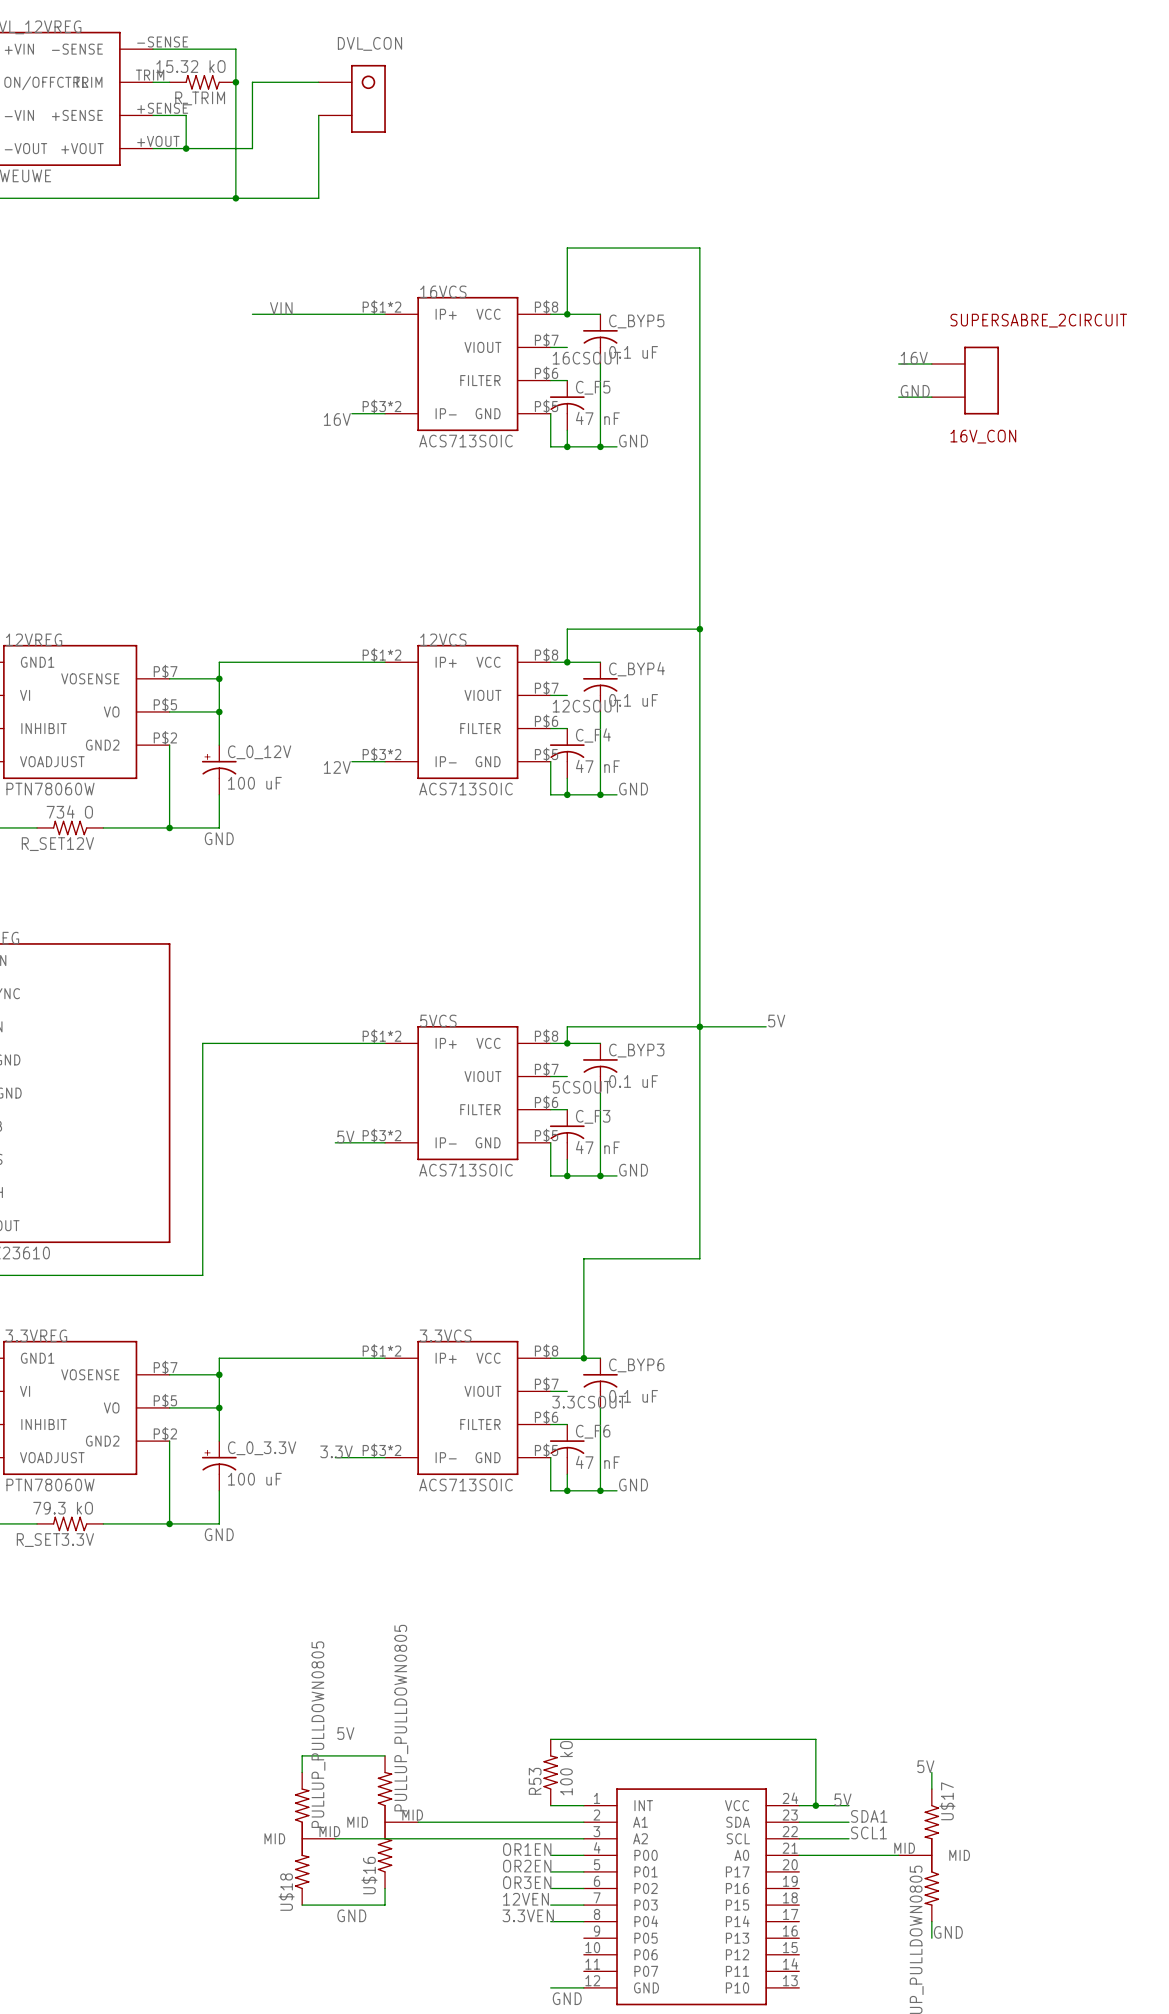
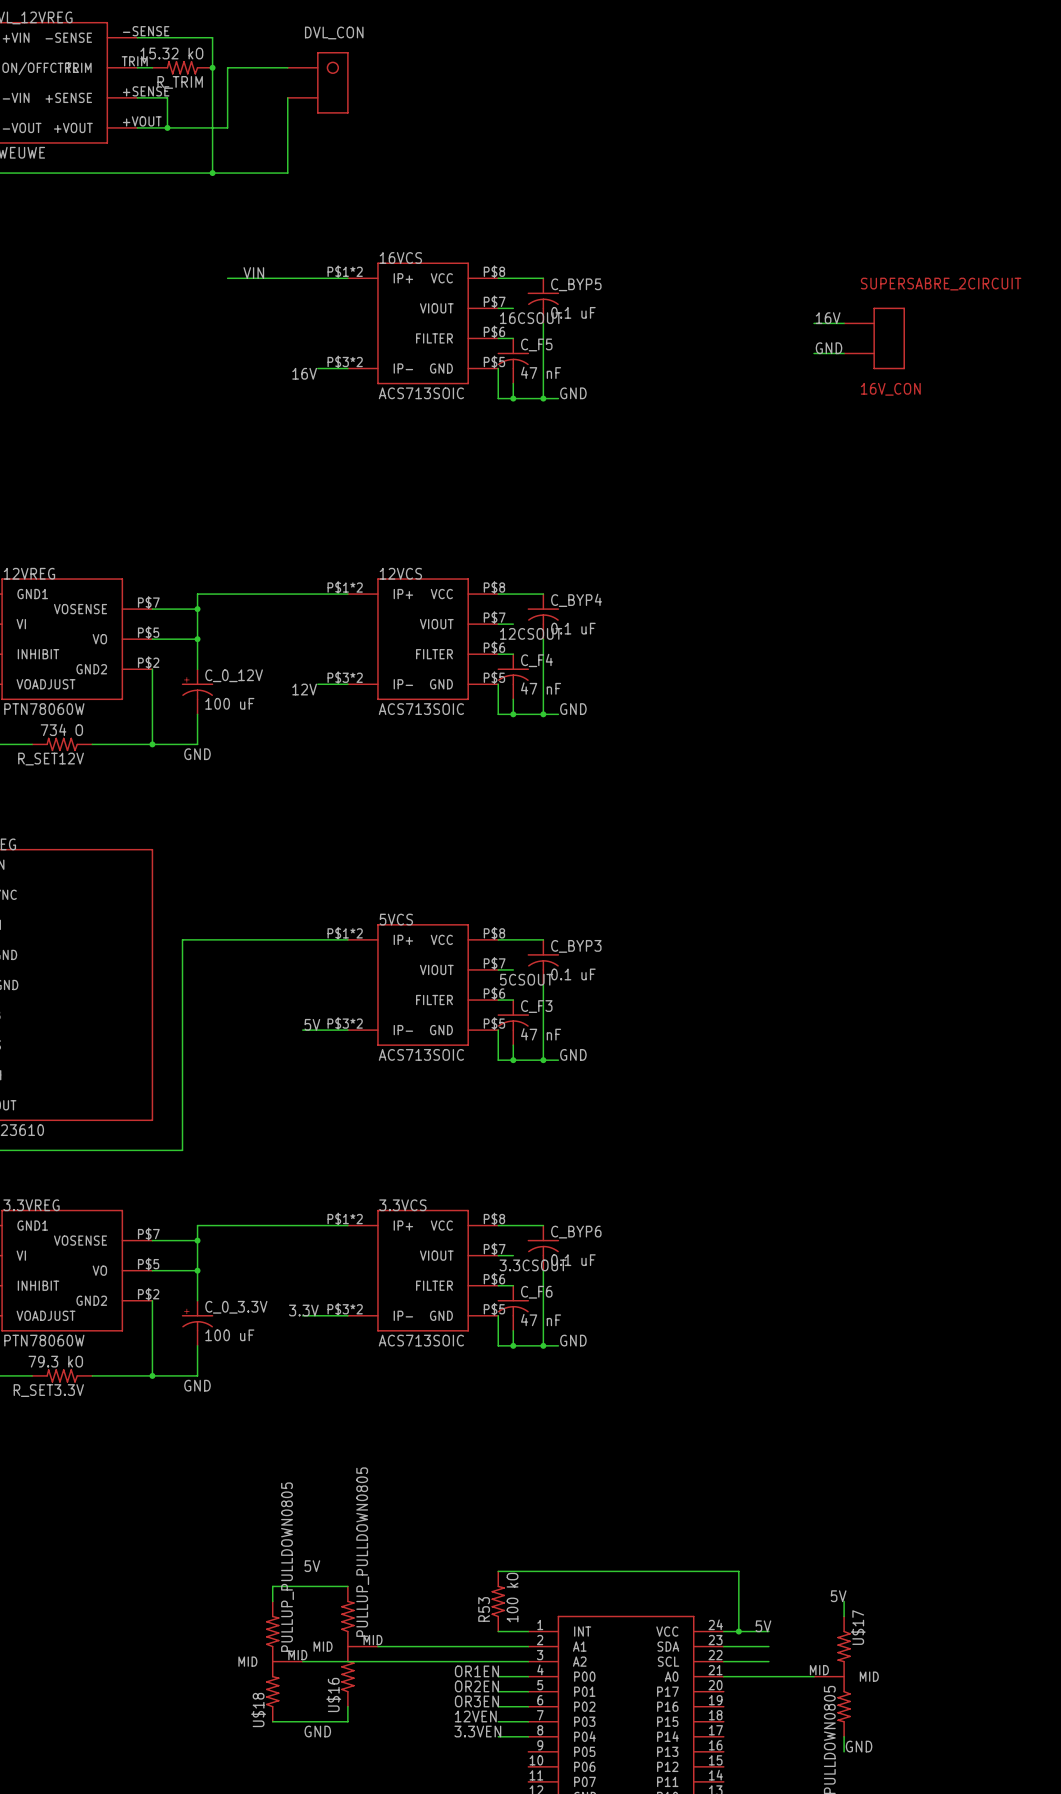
wire: (567, 314) (567, 248) (699, 248) (699, 1258) (583, 1258) (583, 1358) -> none
junction: (567, 314) -> none
wire: (699, 629) (567, 629) (567, 662) -> none
junction: (699, 629) -> none
junction: (567, 662) -> none
label: 5V (776, 1021) -> none
junction: (699, 1026) -> none
wire: (766, 1026) (567, 1026) (567, 1043) -> none
junction: (567, 1043) -> none
junction: (583, 1358) -> none
label: SDA1 (869, 1816) -> none
label: SCL1 (868, 1832) -> none

